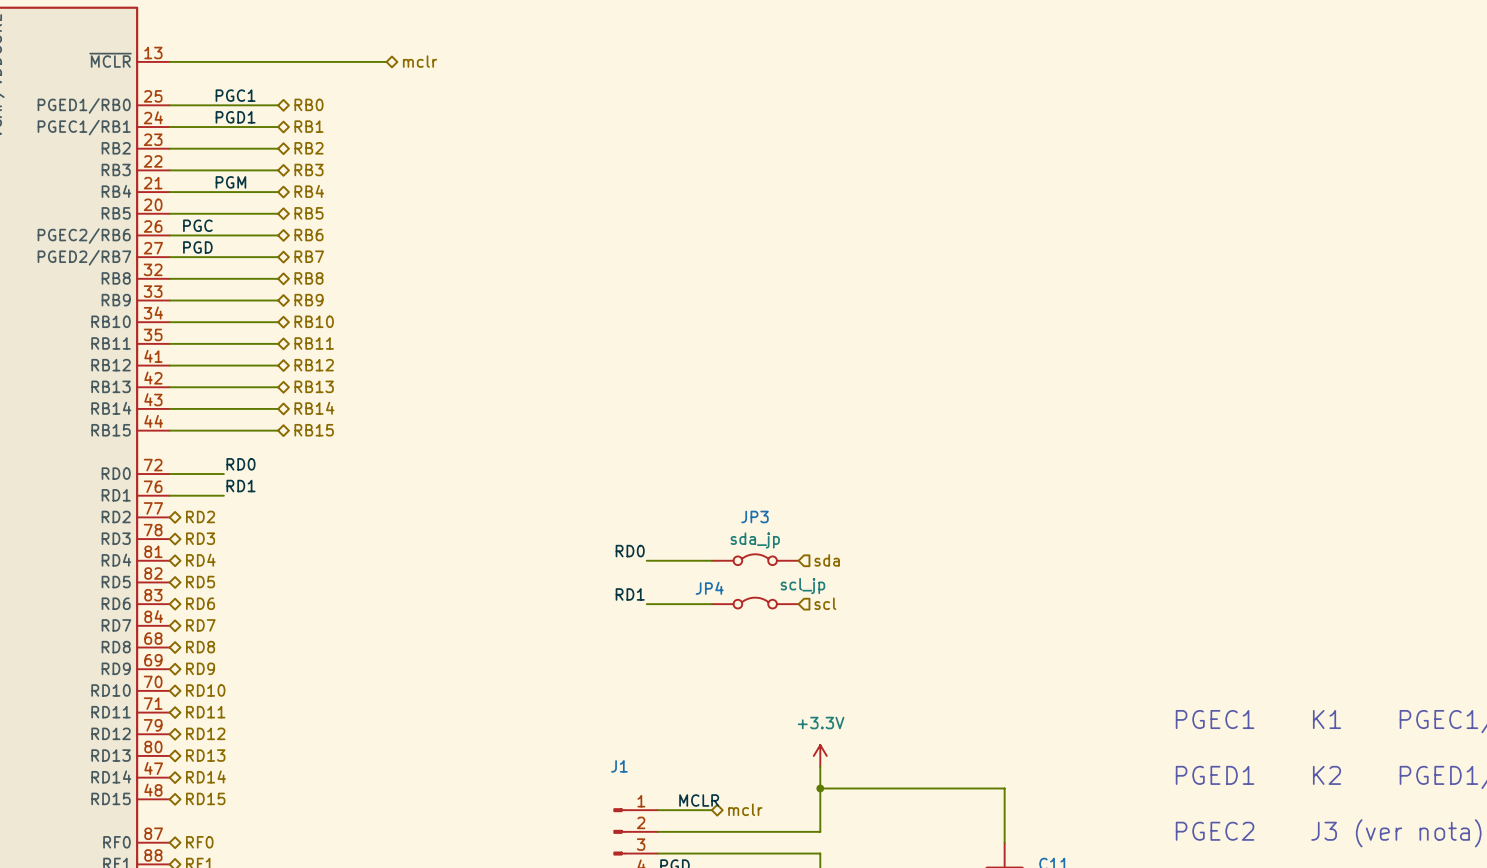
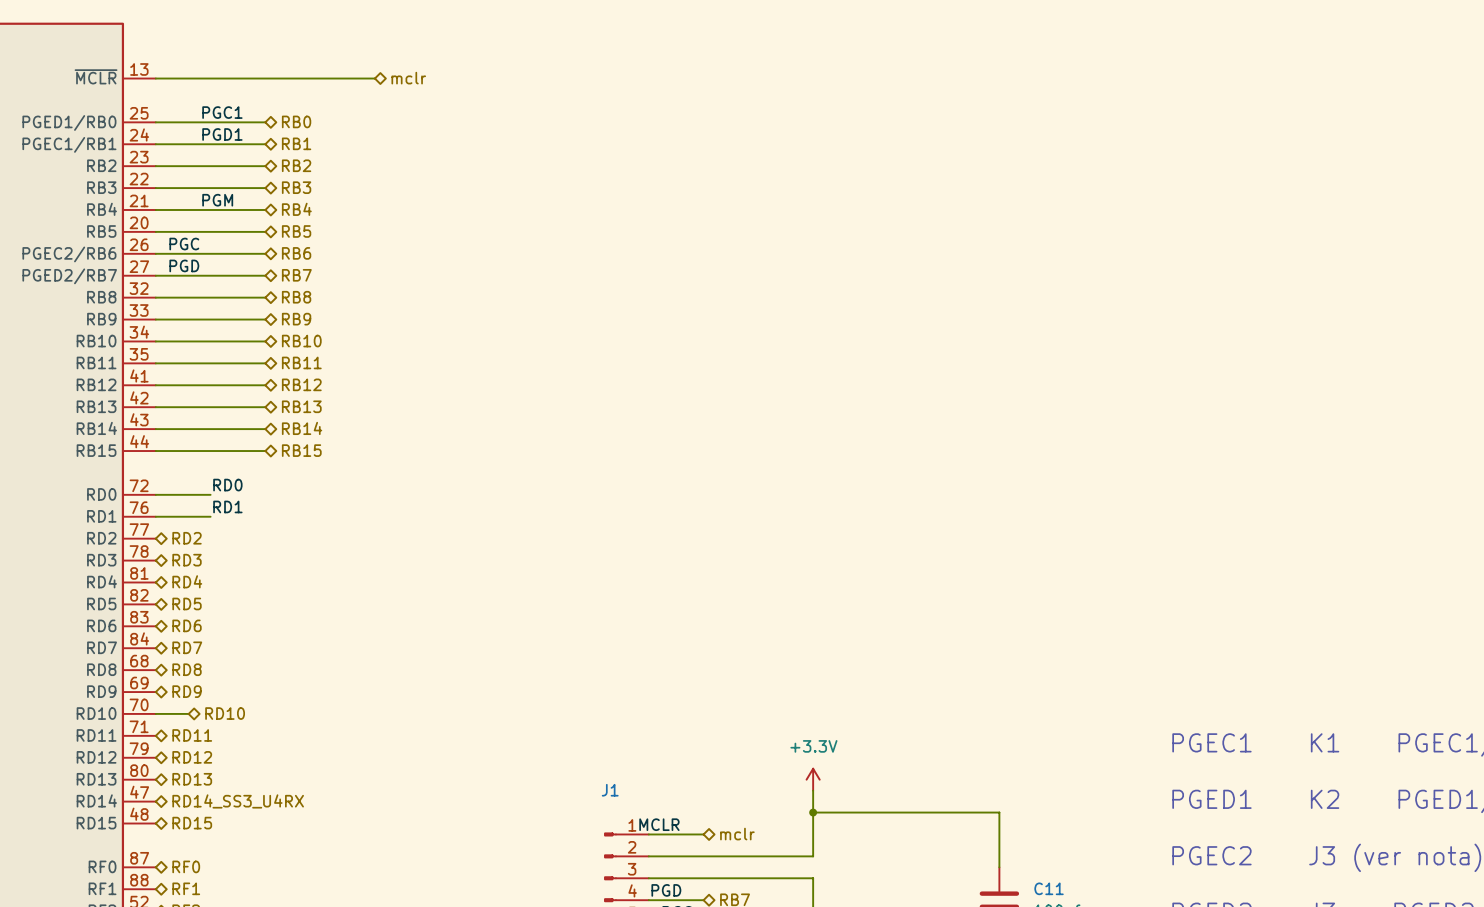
label: RD0 (630, 551) -> none
JP3: sda_jp (755, 559) -> none
wire: (646, 560) (711, 560) -> none
hierarchical label: sda (827, 560) -> none
label: RD1 (630, 594) -> none
JP4: scl_jp (755, 603) -> none
hierarchical label: scl (825, 603) -> none
wire: (646, 604) (711, 604) -> none
wire: none -> (155, 713) (188, 713)
hierarchical label position: RD10 (205, 690) -> RD10 (225, 713)
hierarchical label: RD14 (205, 776) -> RD14_SS3_U4RX (238, 801)
label position: MCLR (699, 800) -> MCLR (659, 824)

